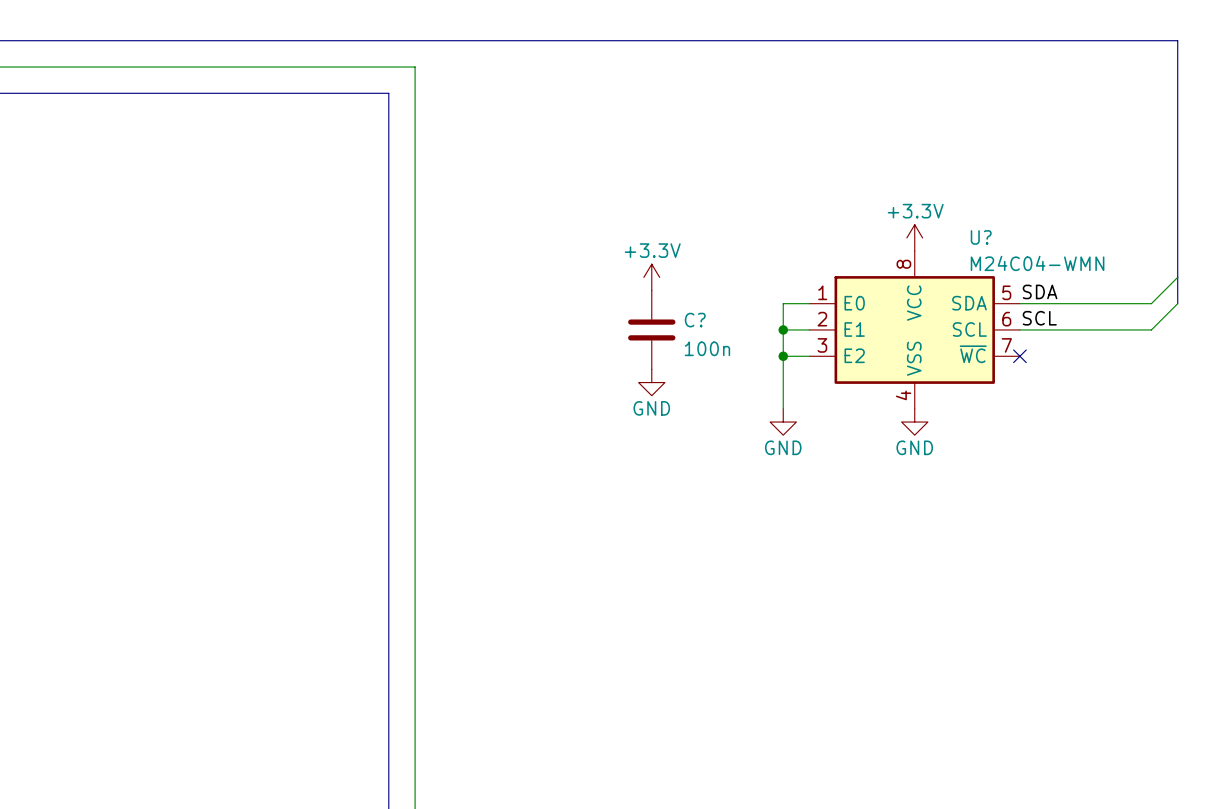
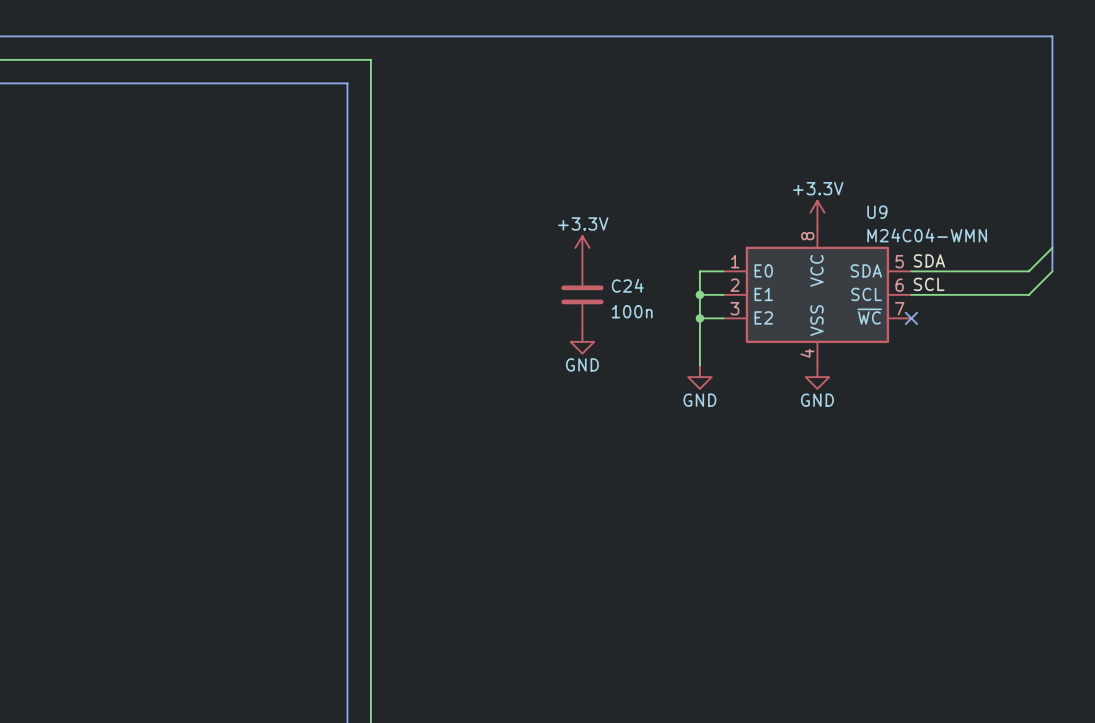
U? name: U? (981, 237) -> U9 (877, 212)
C? name: C? (695, 320) -> C24 (627, 285)

